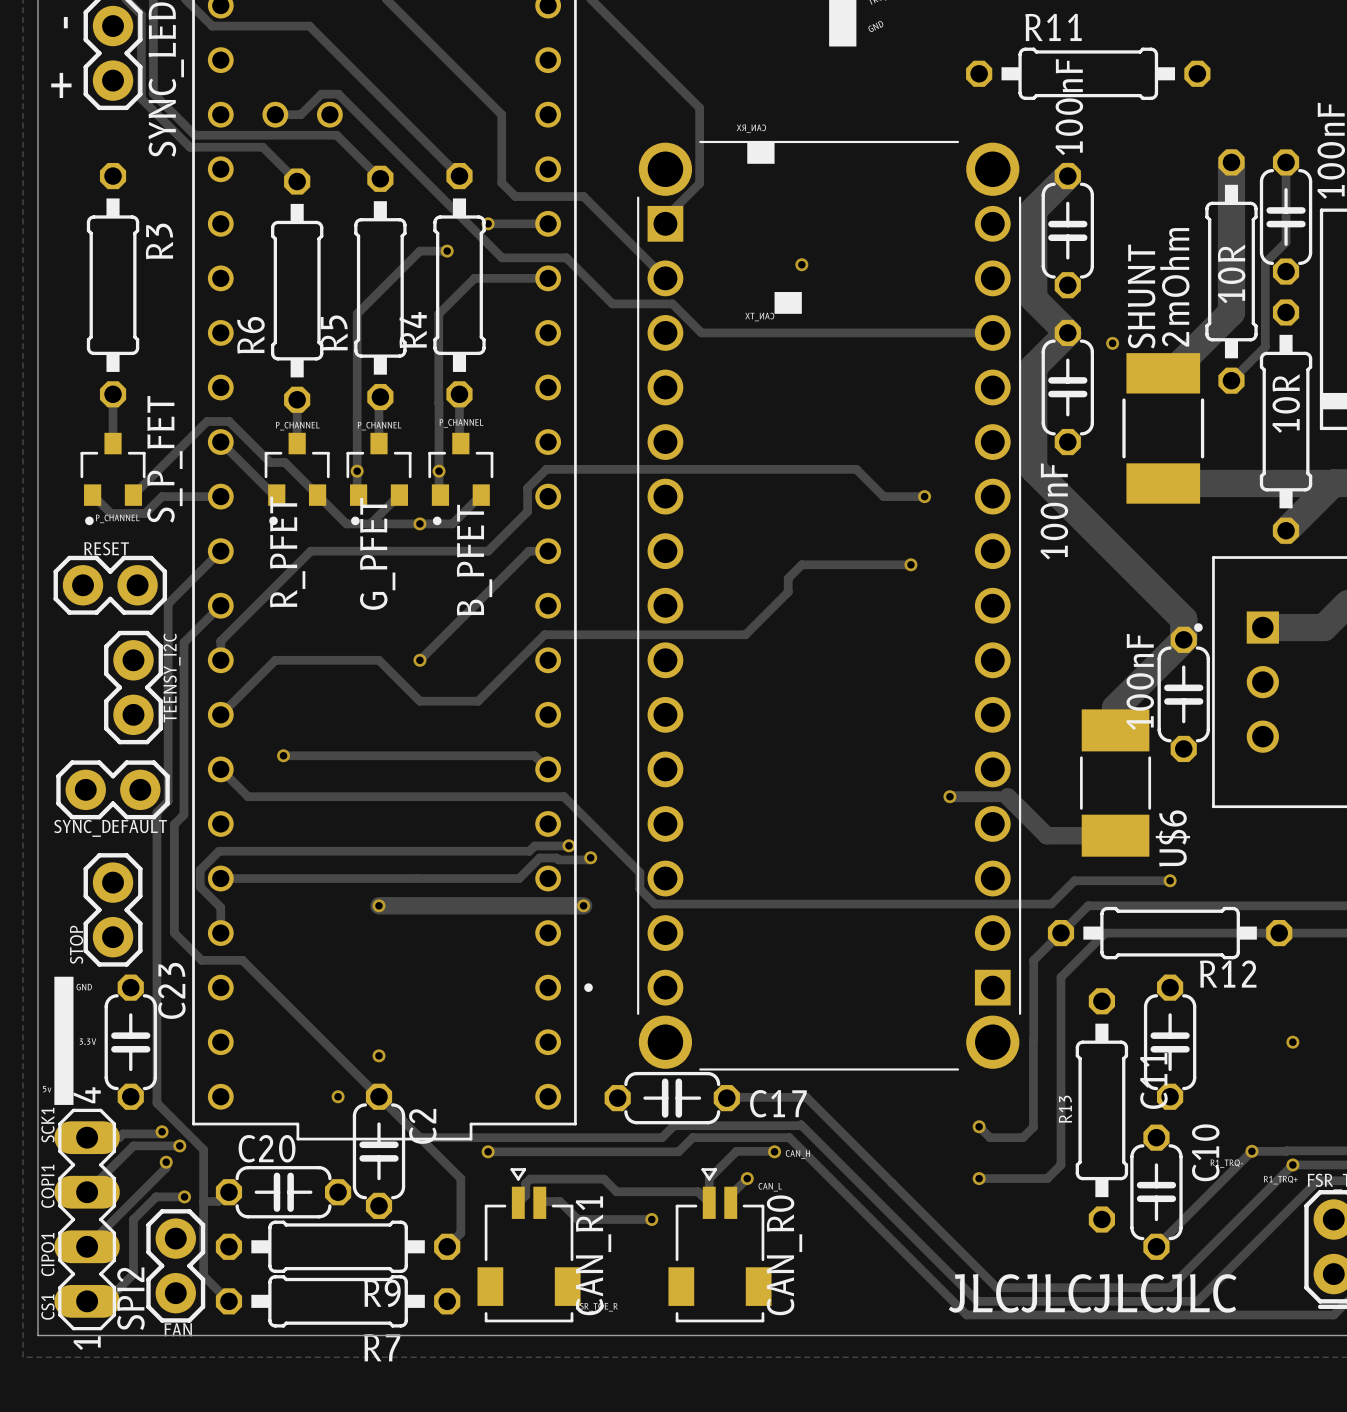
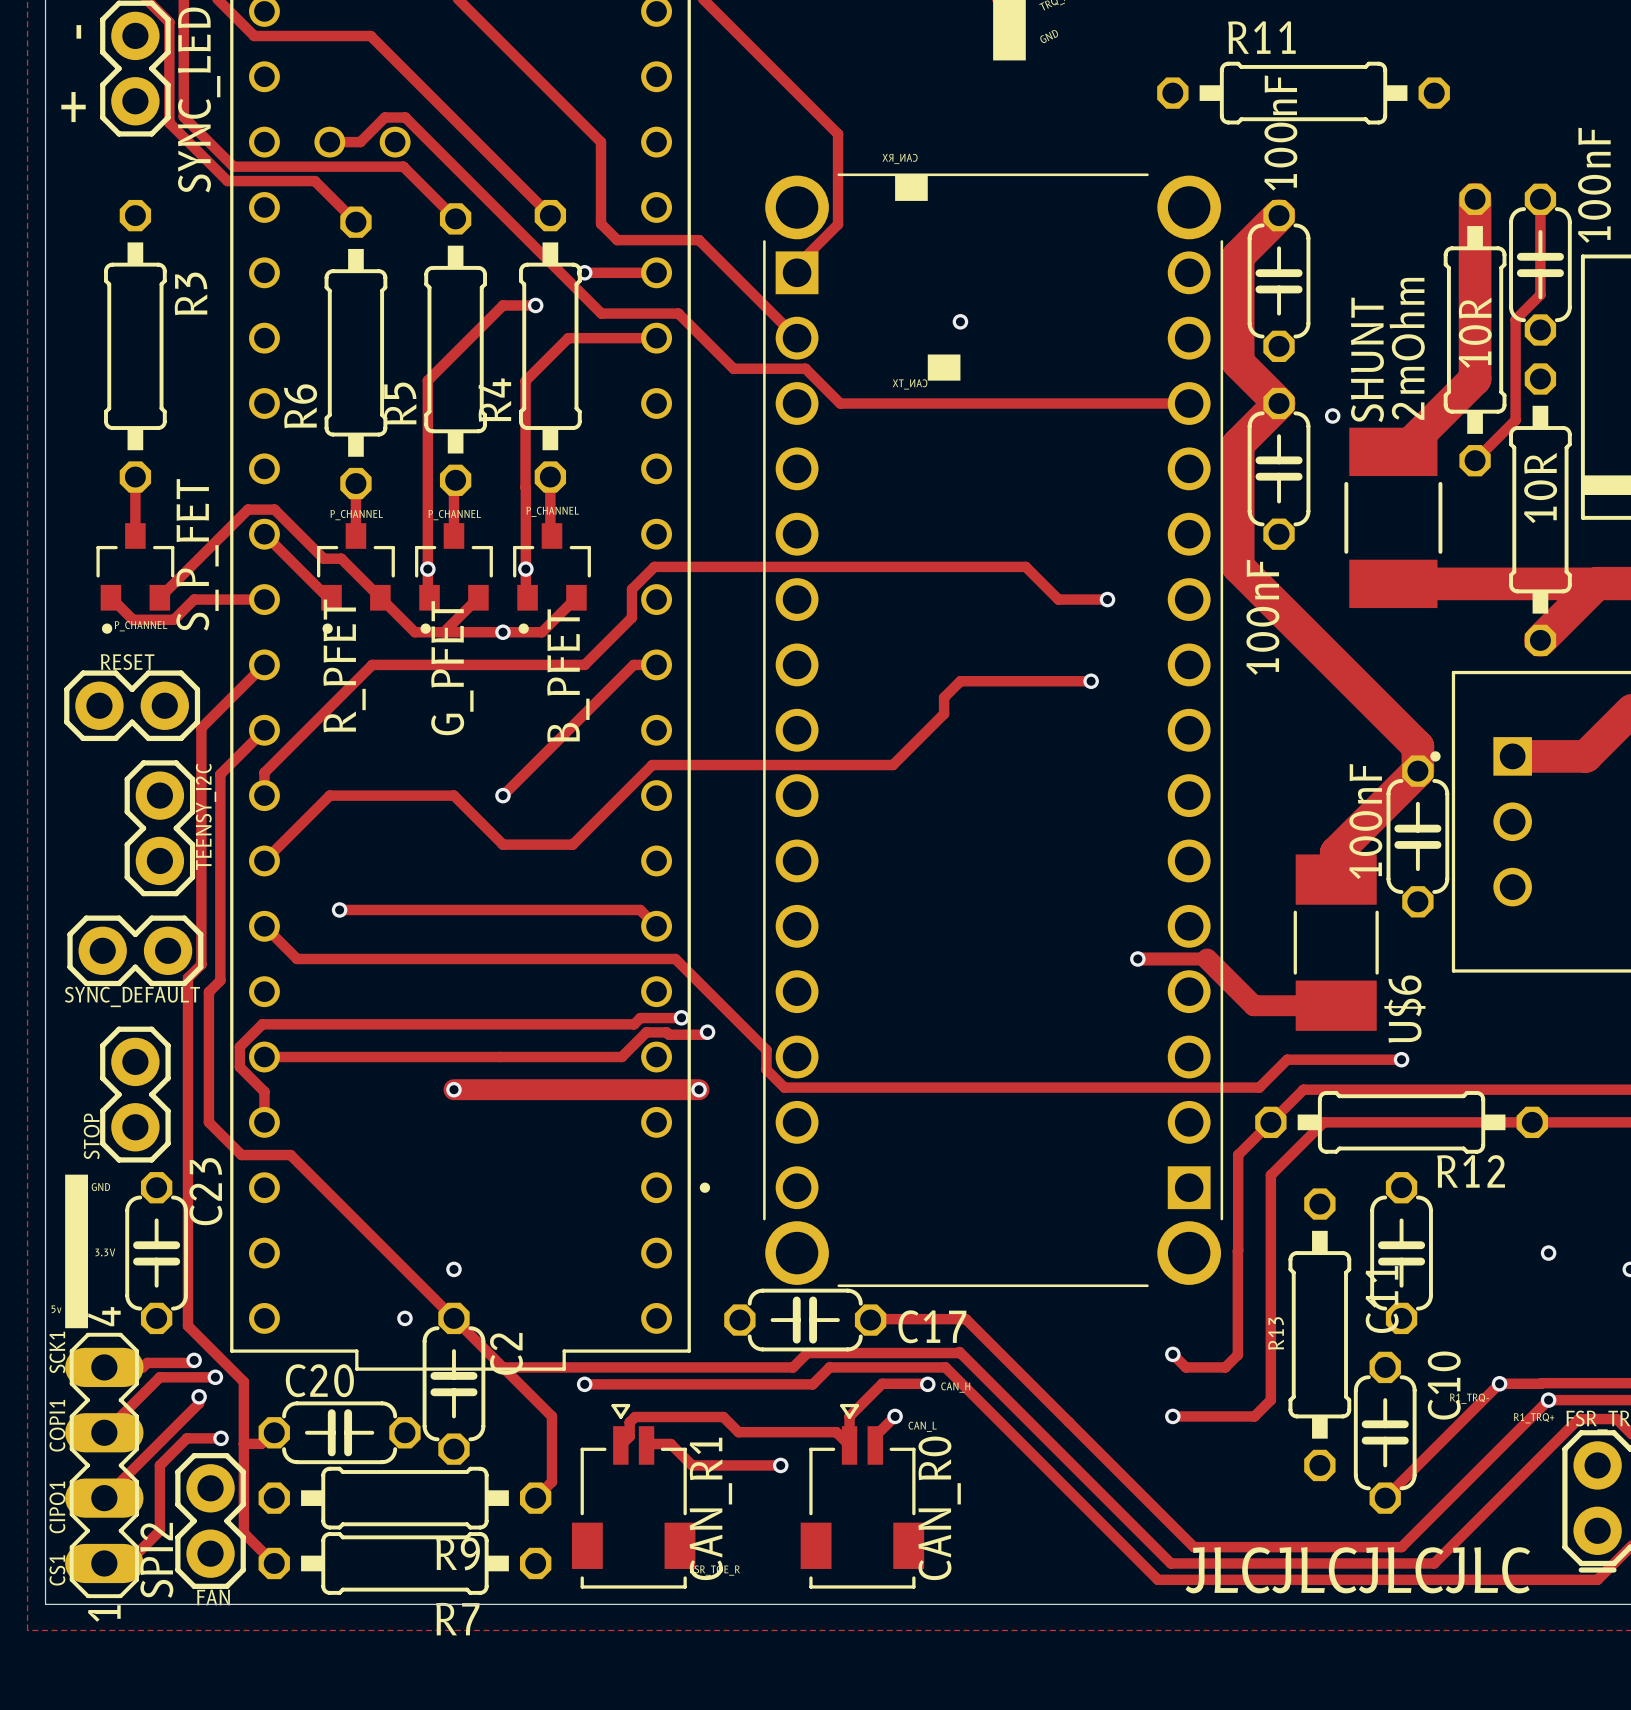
text position: JLCJLCJLCJLC (1092, 1293) -> JLCJLCJLCJLC (1357, 1570)

